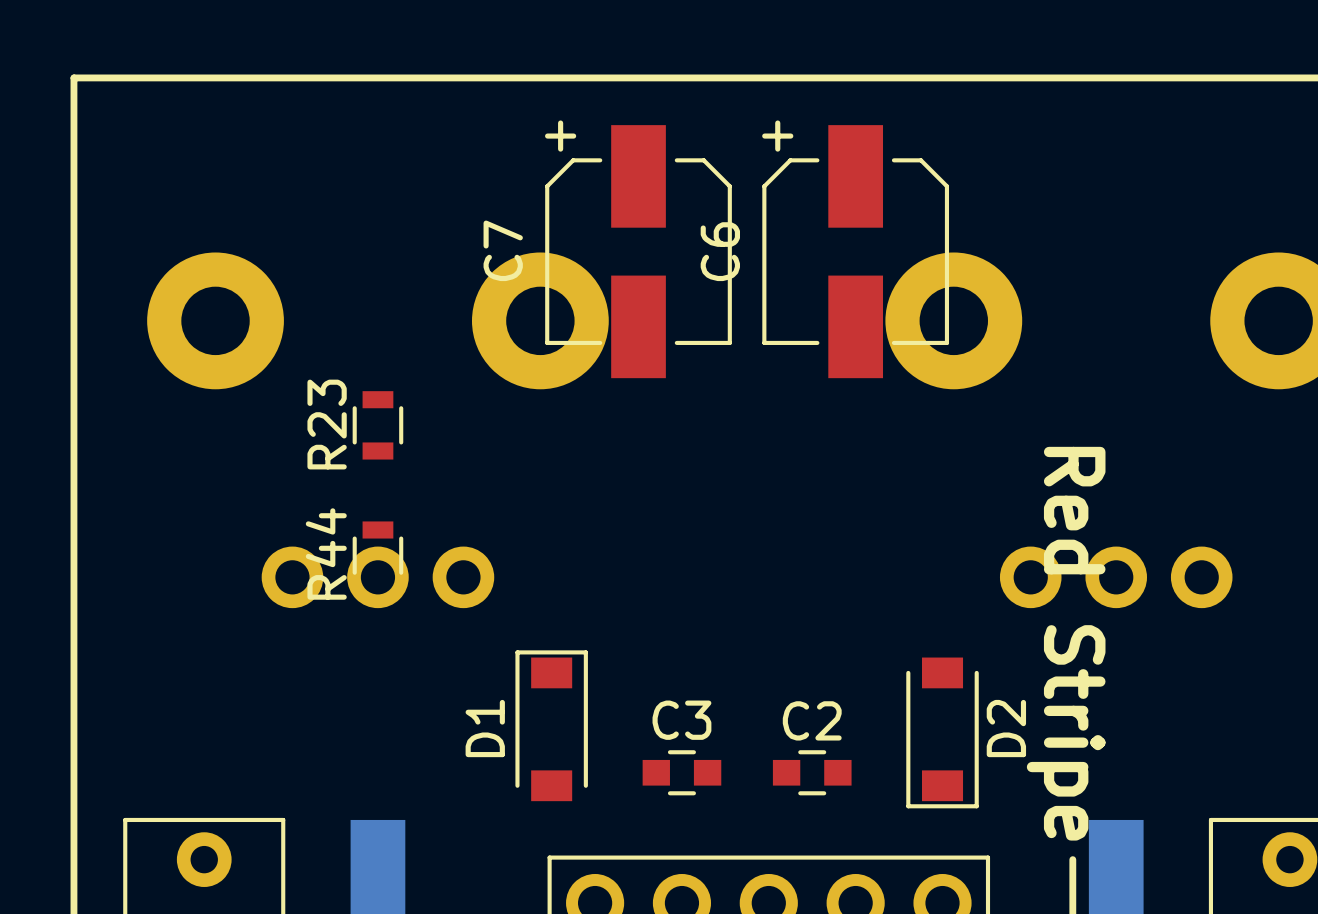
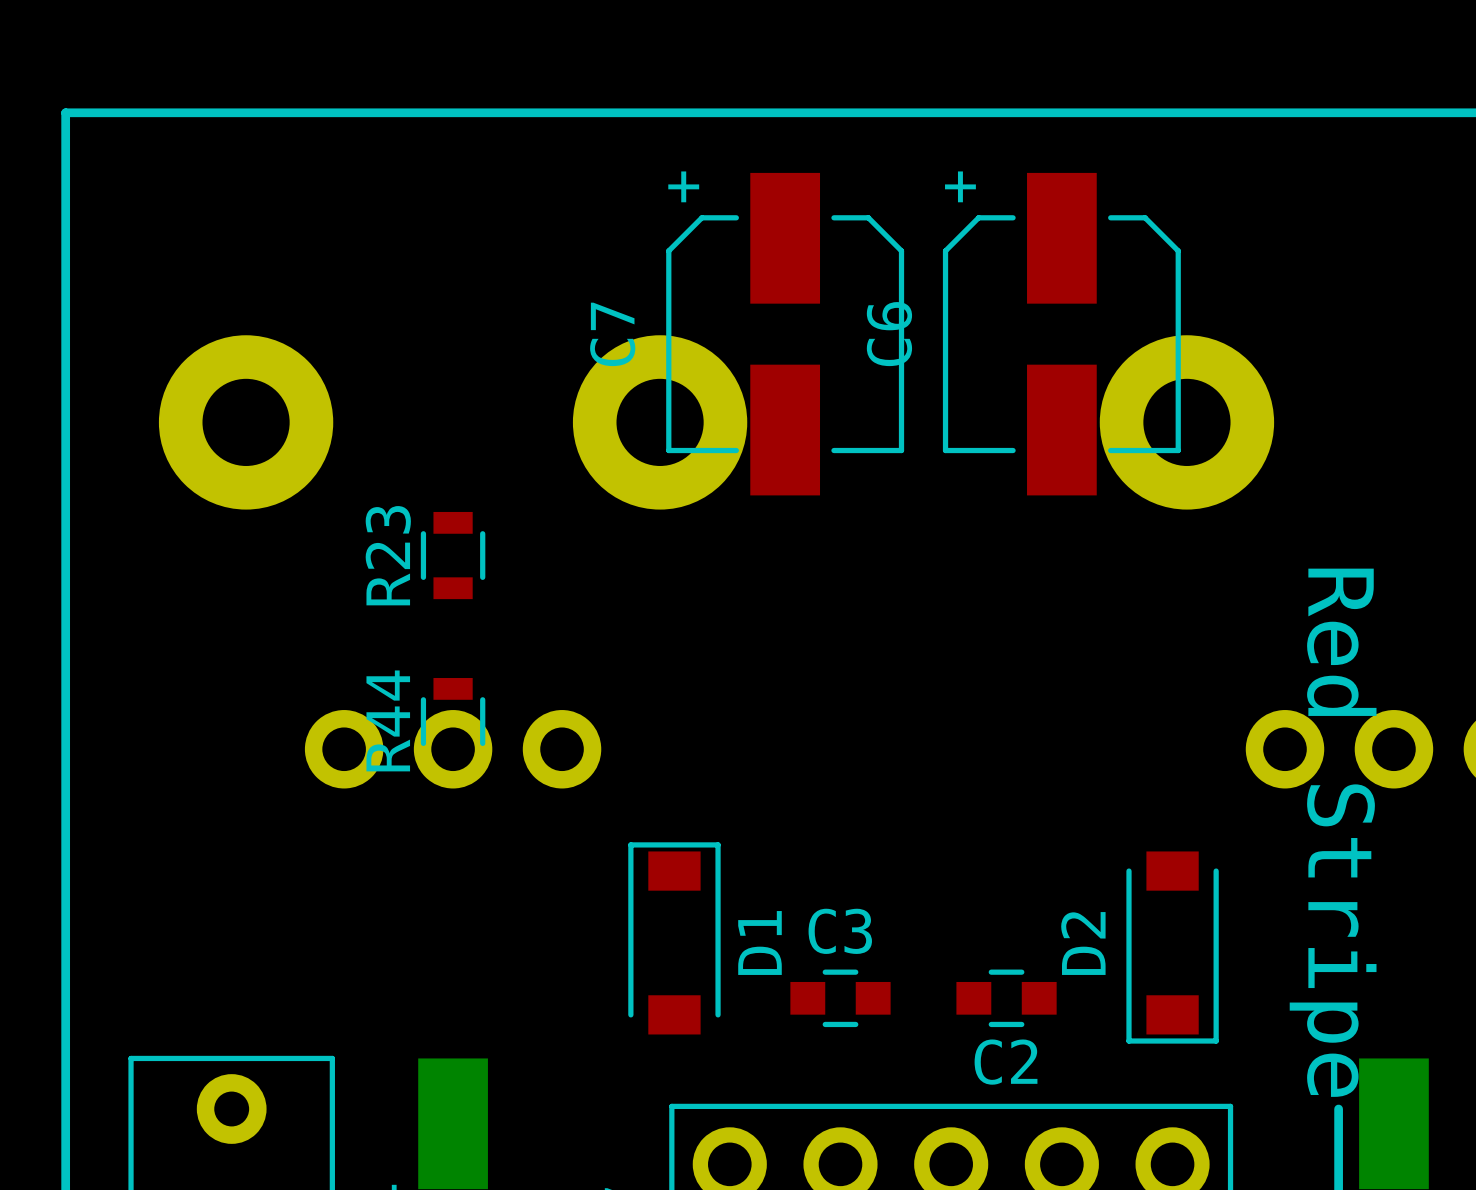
C2 name position: C2 (812, 720) -> C2 (1006, 1062)
D1 name position: D1 (485, 728) -> D1 (759, 942)
D2 name position: D2 (1006, 728) -> D2 (1083, 943)

